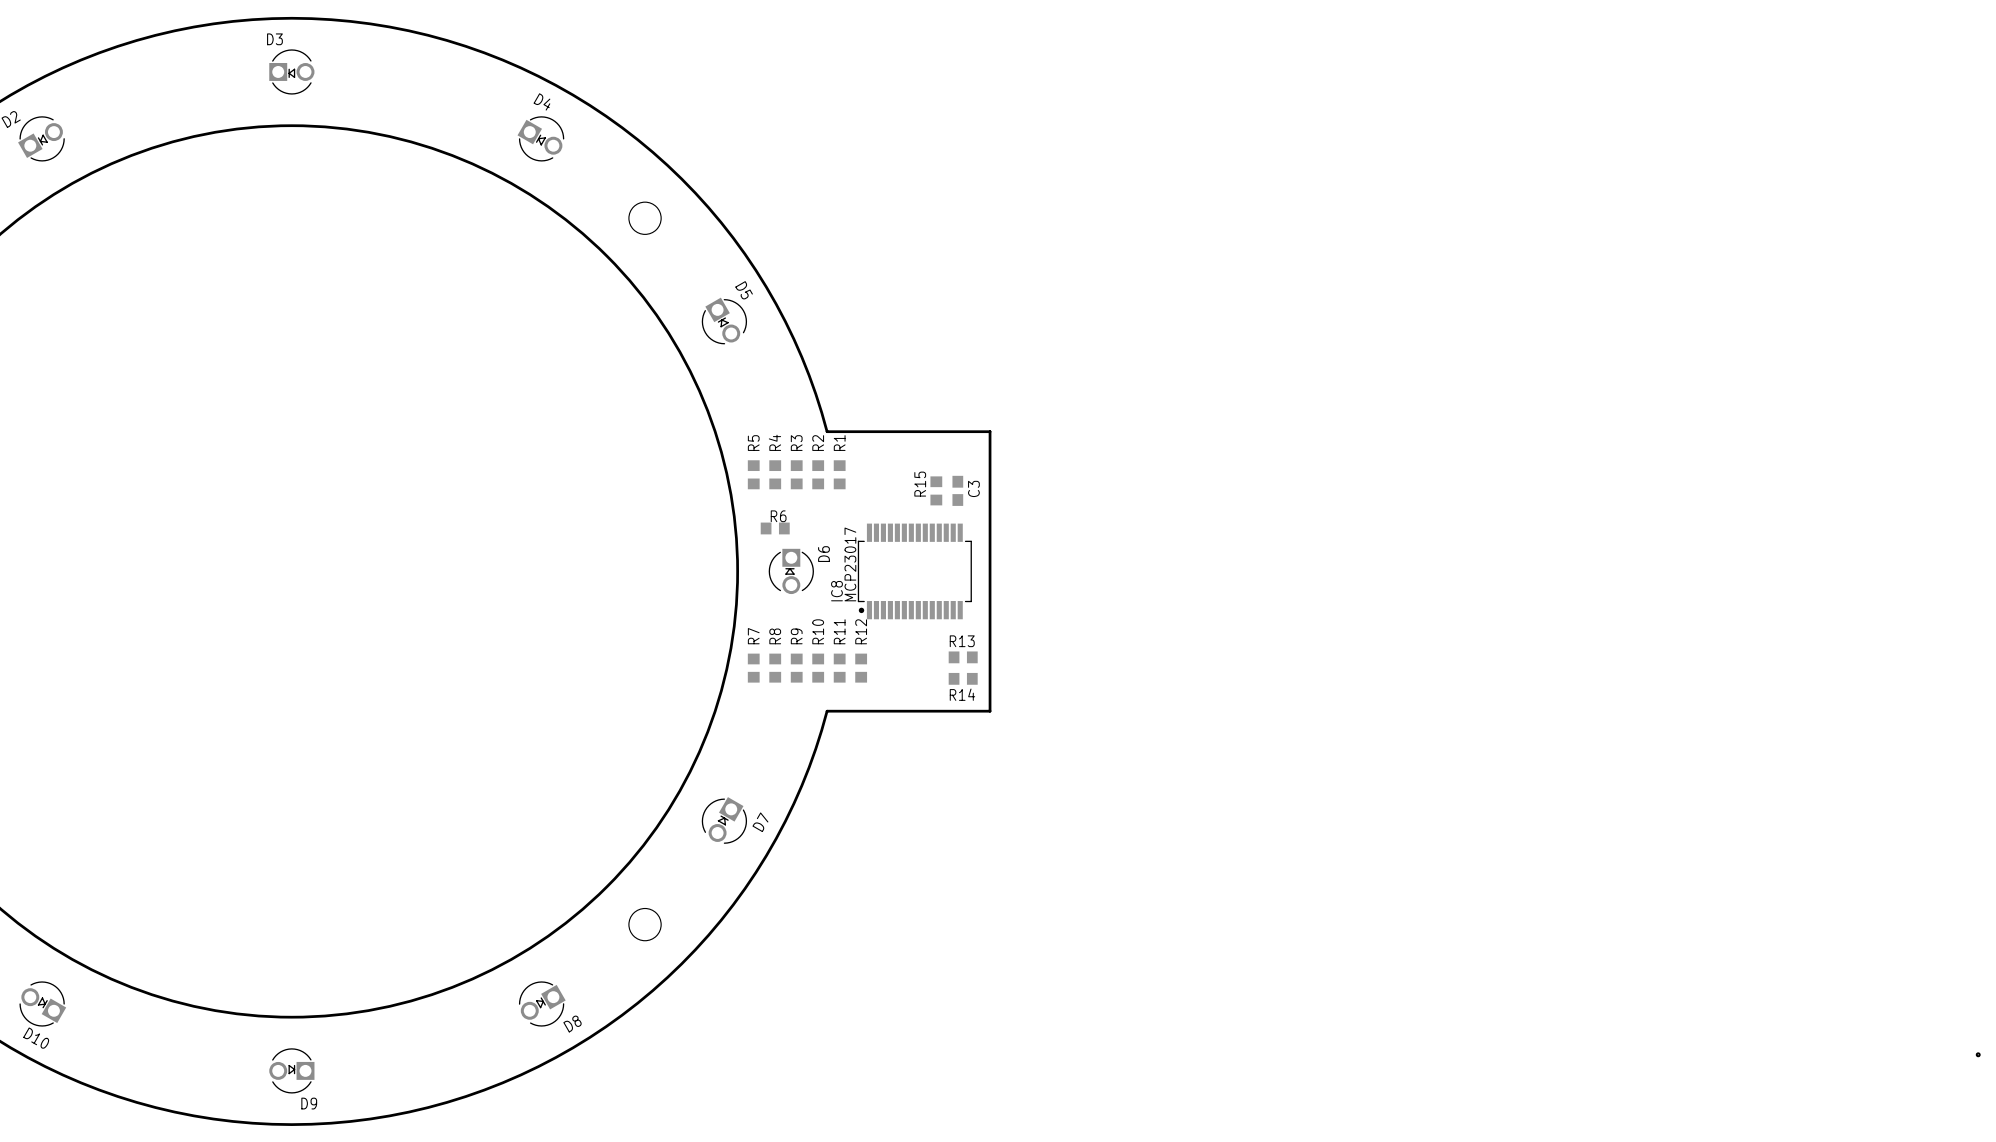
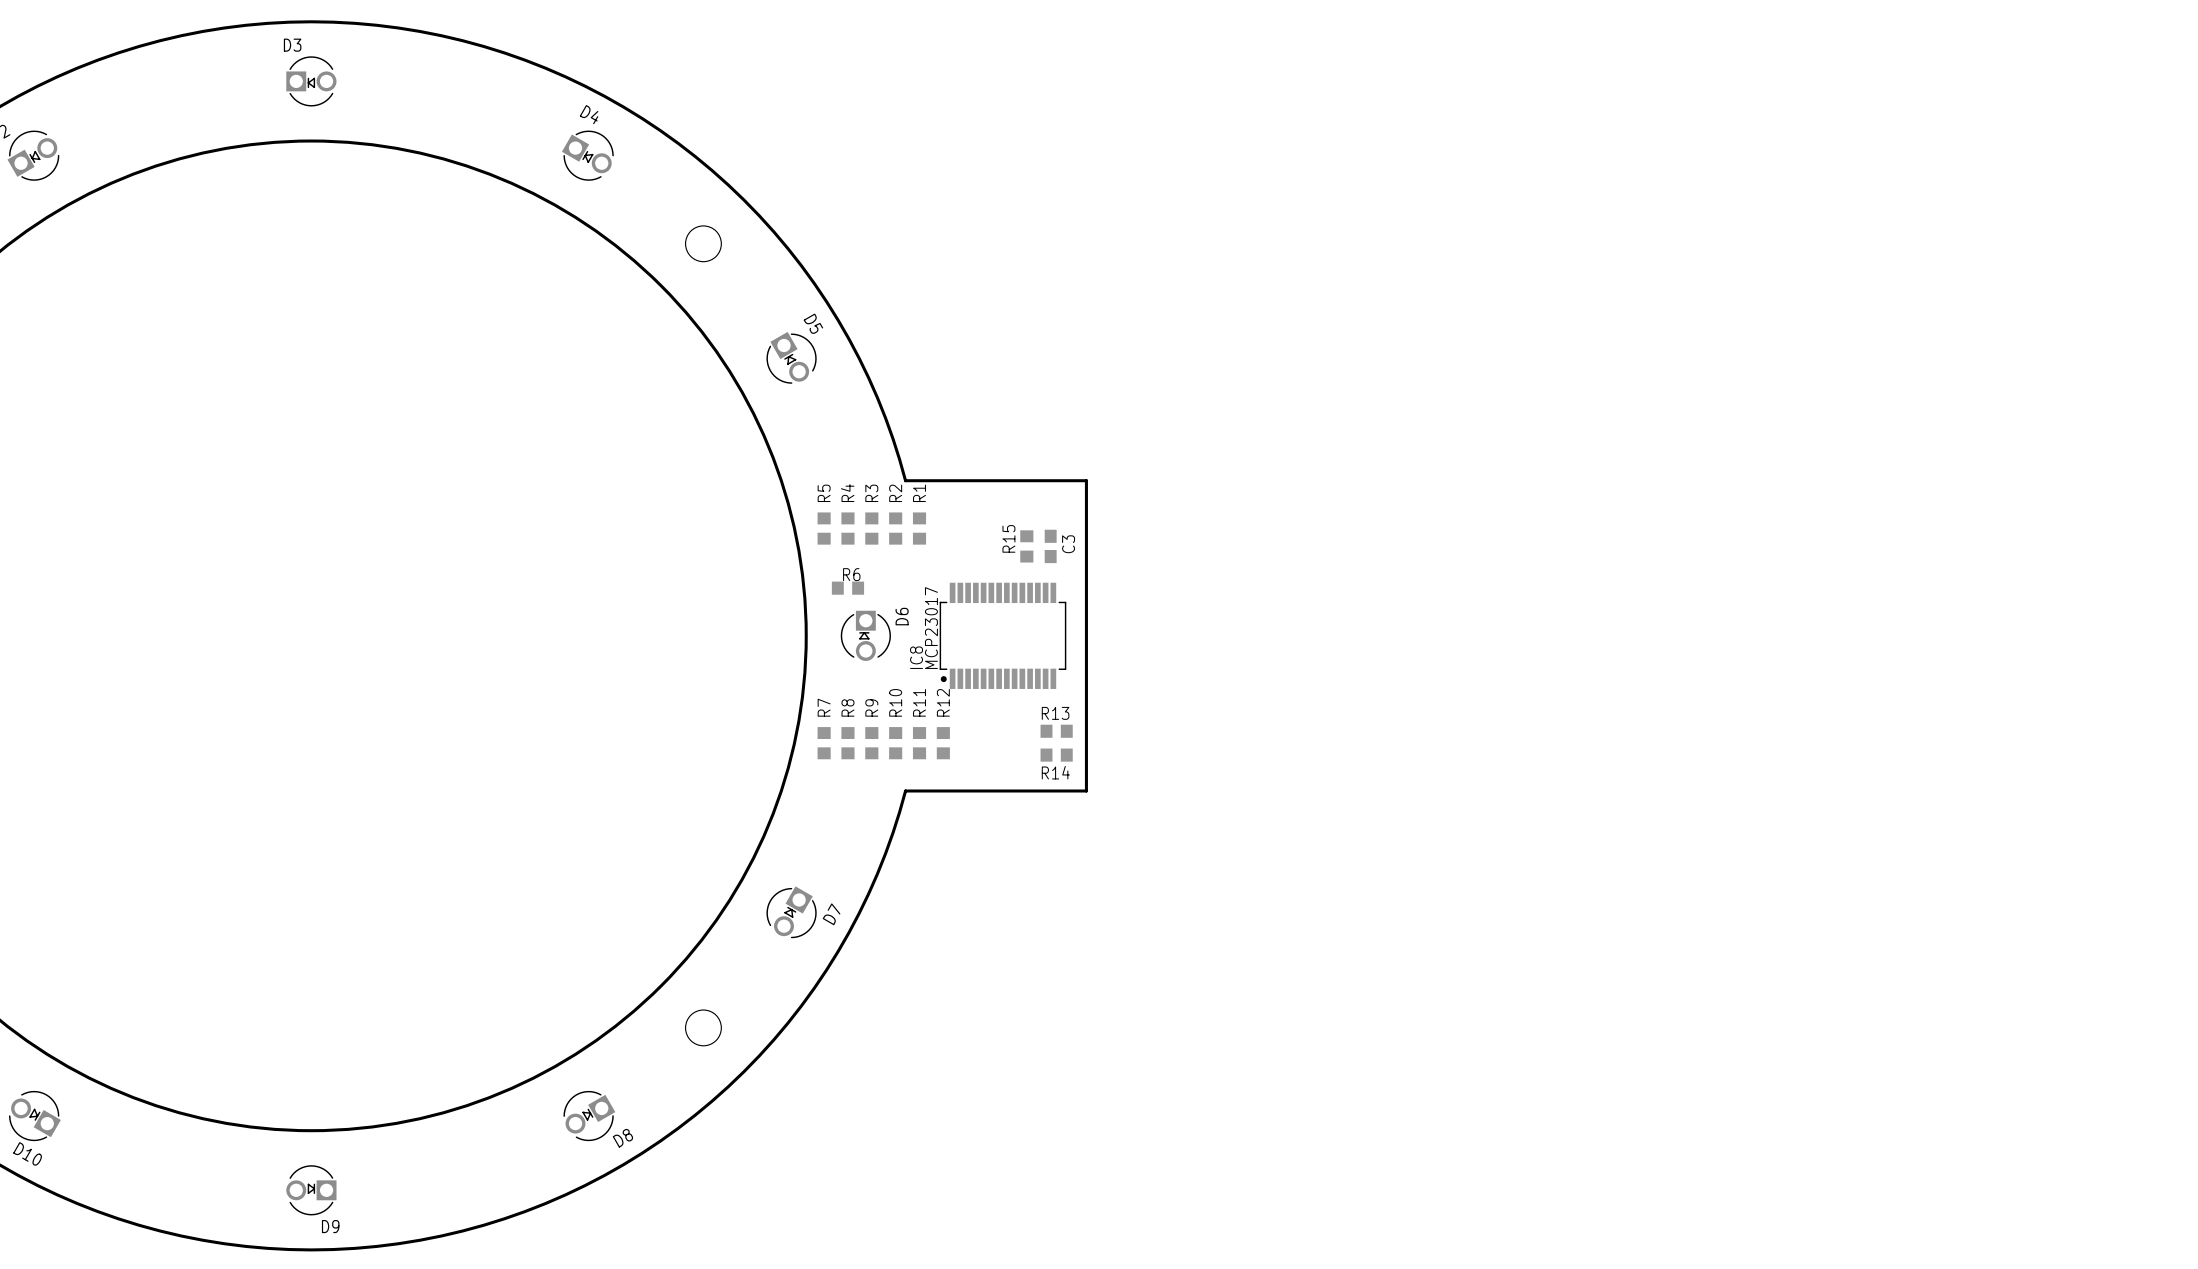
hole: (1978, 1054) -> none
hole: (1978, 1054) -> none

